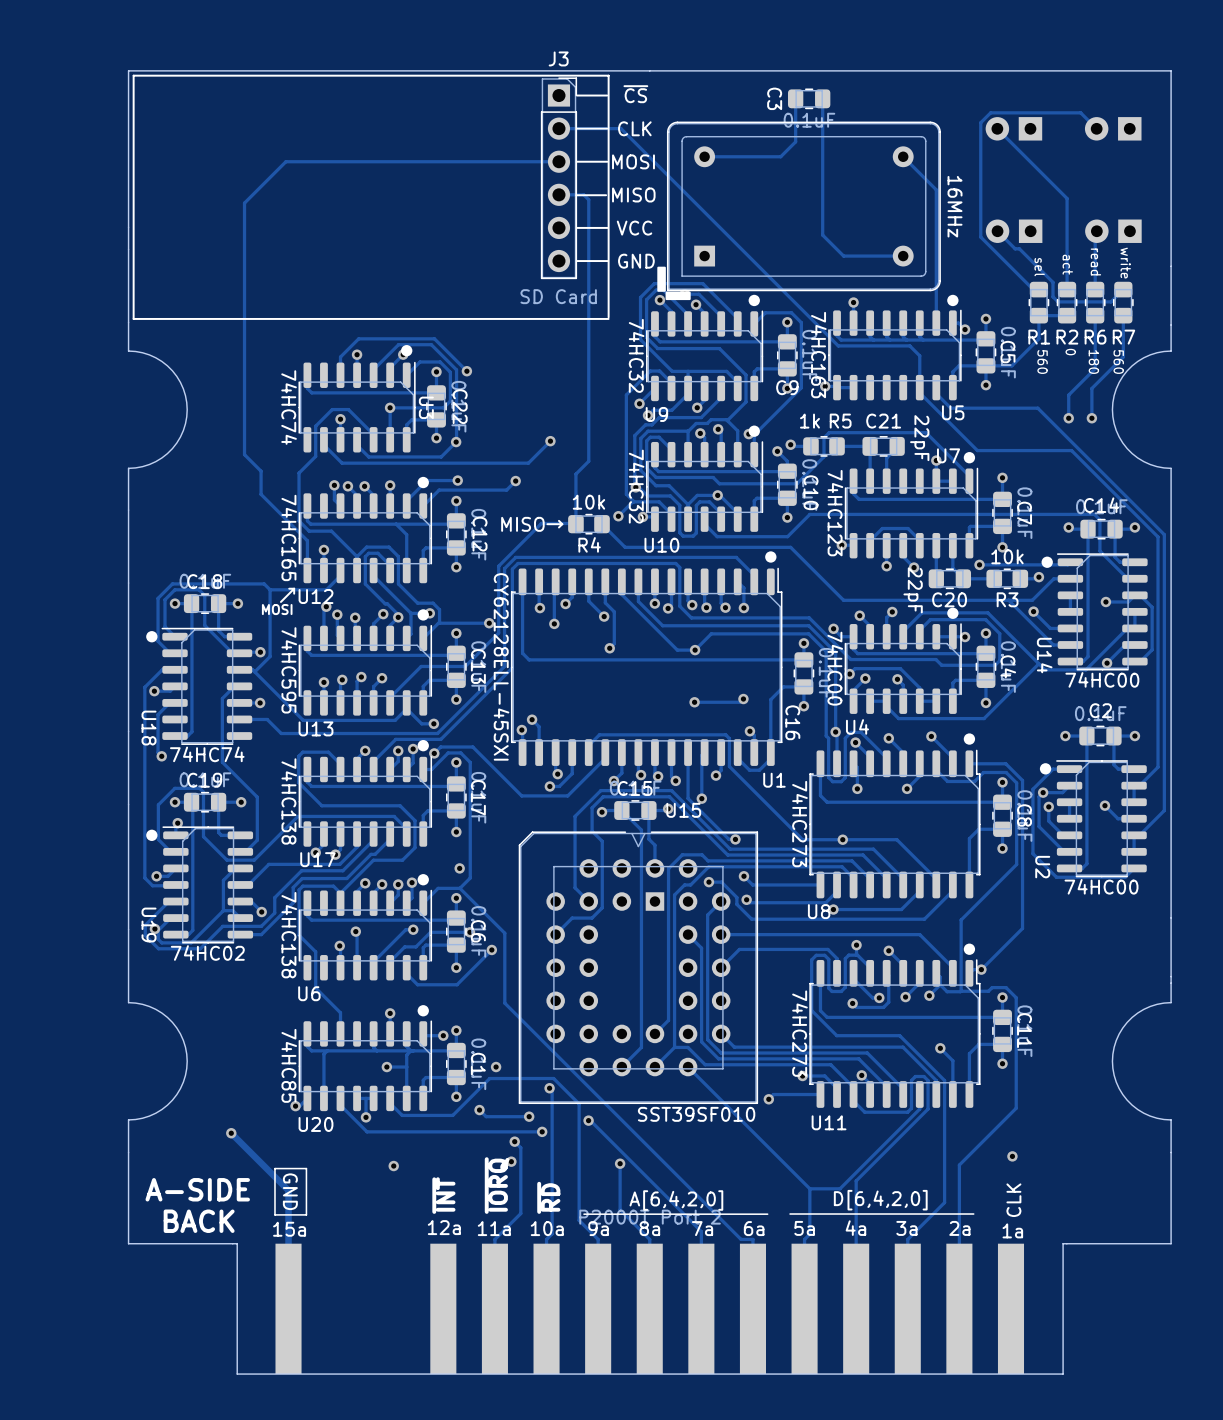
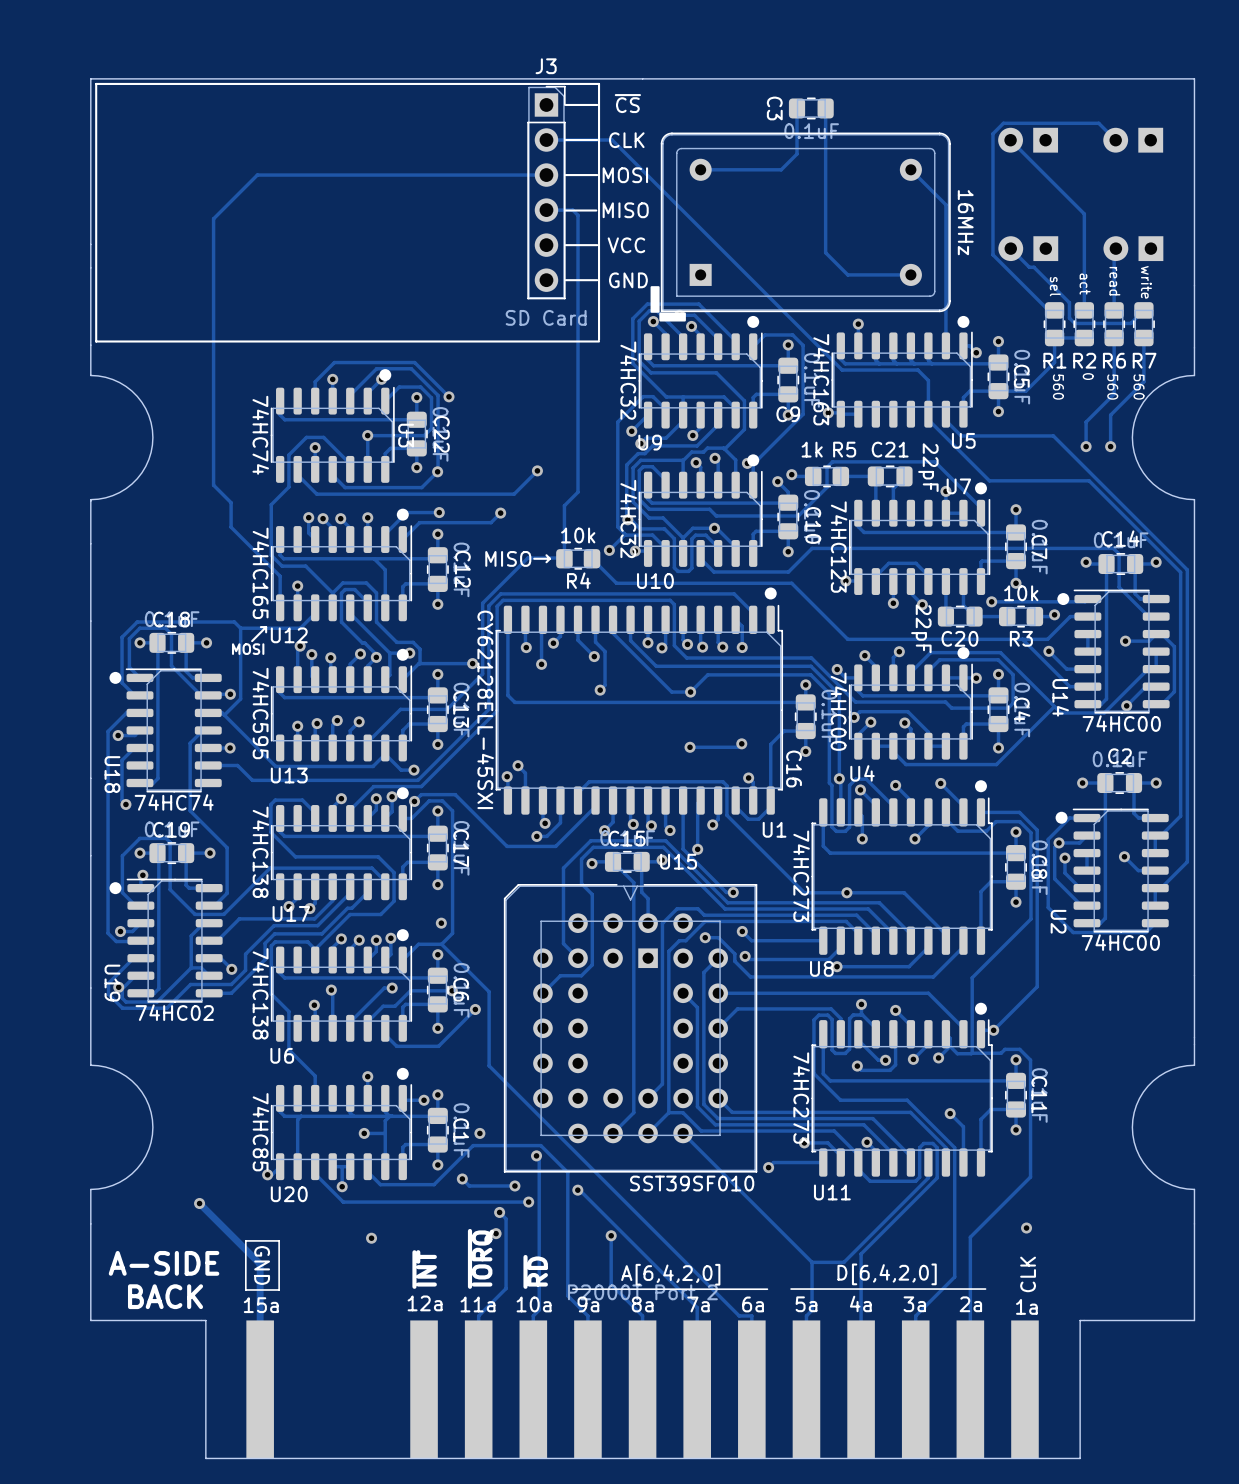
R6 value: 180 (1093, 361) -> 560 (1112, 387)

